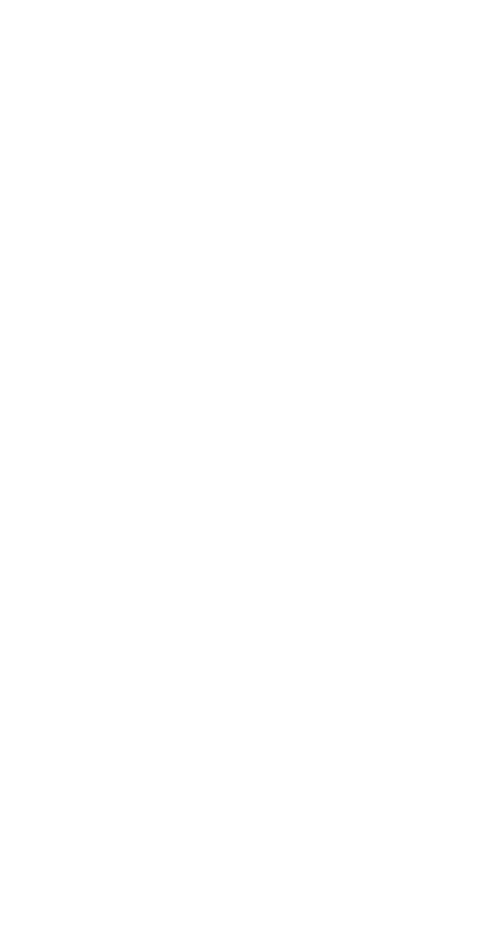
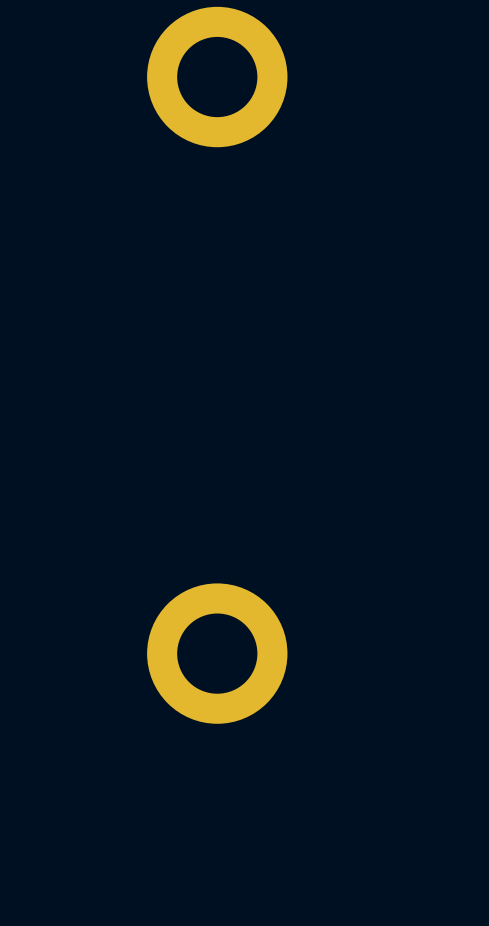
part: none -> (217, 77)
part: none -> (217, 653)

